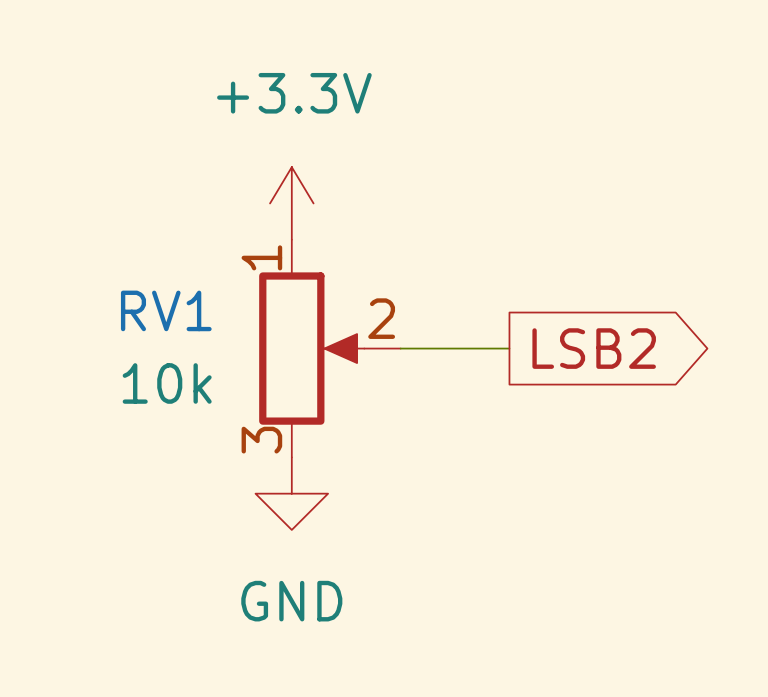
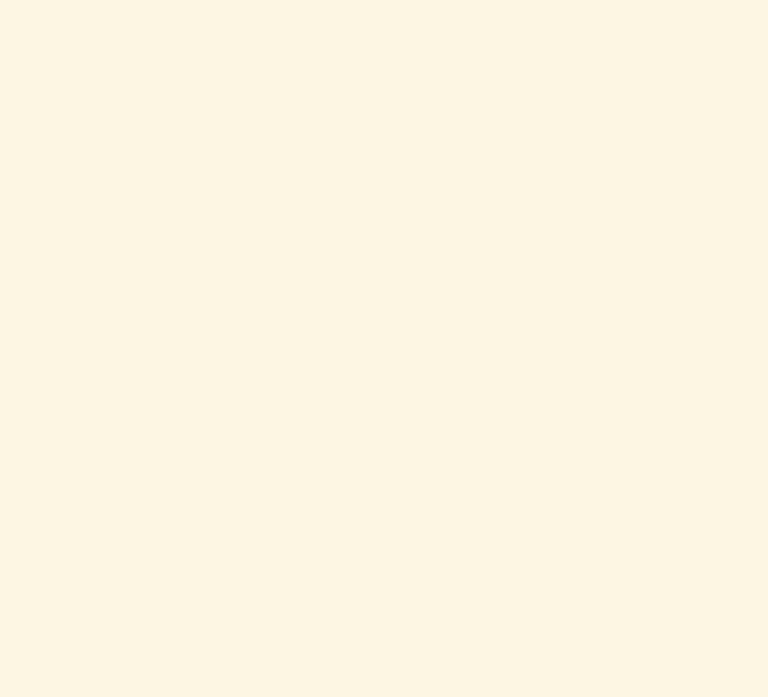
power symbol: +3.3V (291, 203) -> none
RV1: 10k (329, 348) -> none
wire: (400, 348) (509, 348) -> none
global label: LSB2 (594, 348) -> none
power symbol: GND (291, 493) -> none

